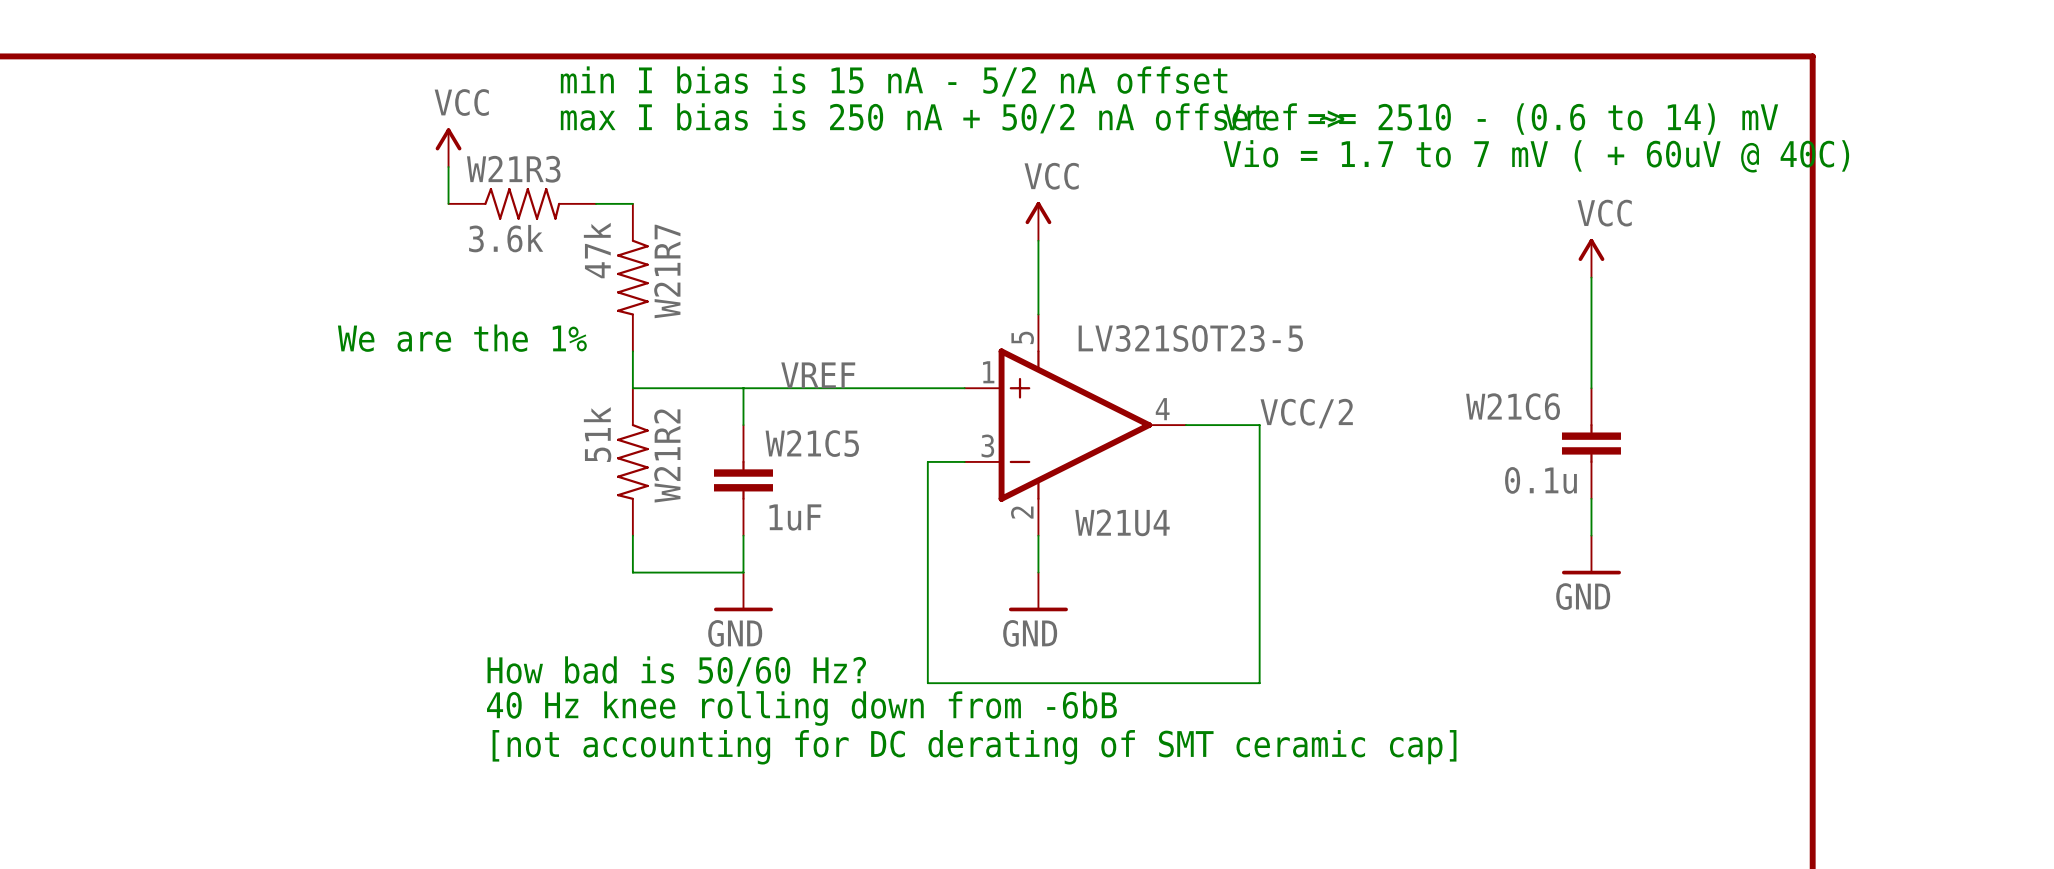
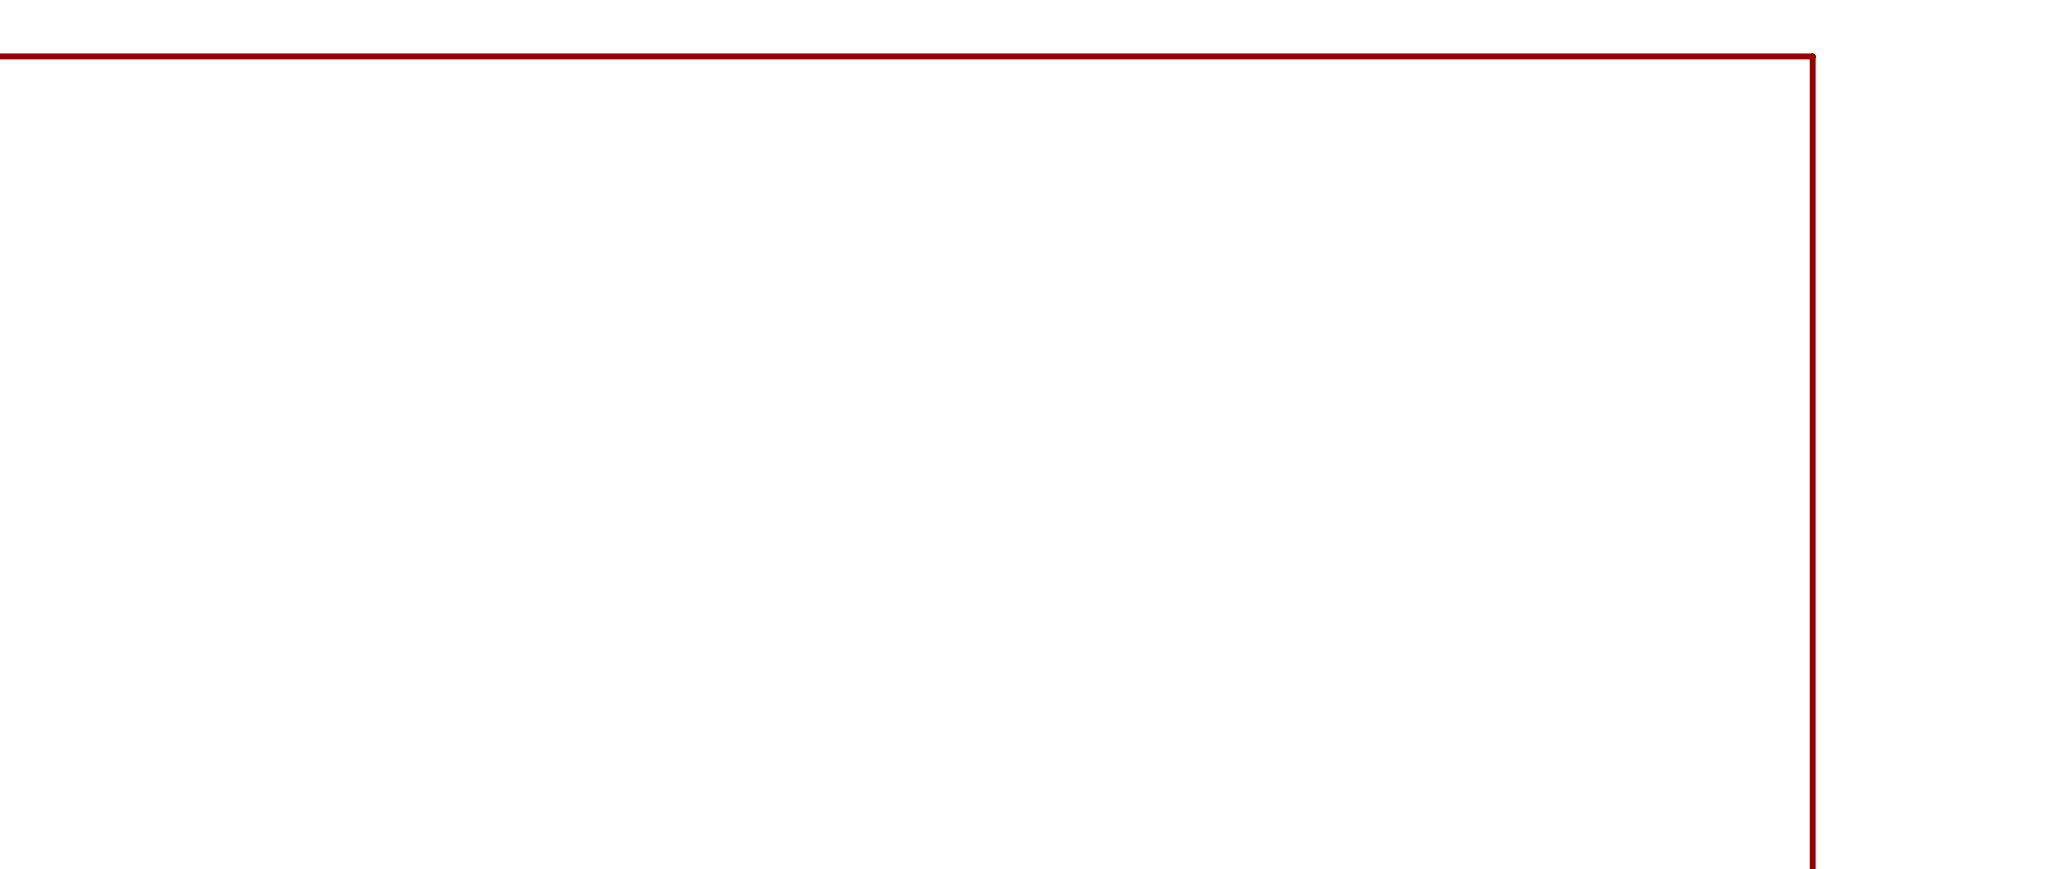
text: min I bias is 15 nA - 5/2 nA offset (894, 81) -> none
text: max I bias is 250 nA + 50/2 nA offset => (952, 118) -> none
text: Vref ~= 2510 - (0.6 to 14) mV (1500, 119) -> none
power symbol: VCC (448, 147) -> none
text: Vio = 1.7 to 7 mV ( + 60uV @ 40C) (1536, 156) -> none
wire: (448, 167) (448, 203) -> none
W21R3: 3.6k (522, 203) -> none
wire: (596, 203) (632, 203) -> none
power symbol: VCC (1038, 221) -> none
wire: (1038, 240) (1038, 314) -> none
power symbol: VCC (1591, 258) -> none
W21R7: 47k (632, 277) -> none
wire: (1591, 277) (1591, 388) -> none
text: We are the 1% (462, 338) -> none
wire: (632, 351) (632, 388) (964, 388) -> none
label: VREF (818, 375) -> none
wire: (743, 388) (743, 425) -> none
label: VCC/2 (1306, 413) -> none
W21U4: LV321SOT23-5 (1075, 425) -> none
wire: (1185, 425) (1259, 425) (1259, 683) (927, 683) (927, 461) (964, 461) -> none
W21C6: 0.1u (1591, 443) -> none
W21R2: 51k (632, 461) -> none
W21C5: 1uF (743, 480) -> none
wire: (1591, 498) (1591, 535) -> none
wire: (632, 535) (632, 572) (743, 572) (743, 535) -> none
wire: (1038, 535) (1038, 572) -> none
power symbol: GND (1591, 555) -> none
power symbol: GND (743, 591) -> none
power symbol: GND (1038, 591) -> none
text: How bad is 50/60 Hz? (676, 671) -> none
text: 40 Hz knee rolling down from -6bB (801, 708) -> none
text: [not accounting for DC derating of SMT ceramic cap] (974, 747) -> none

